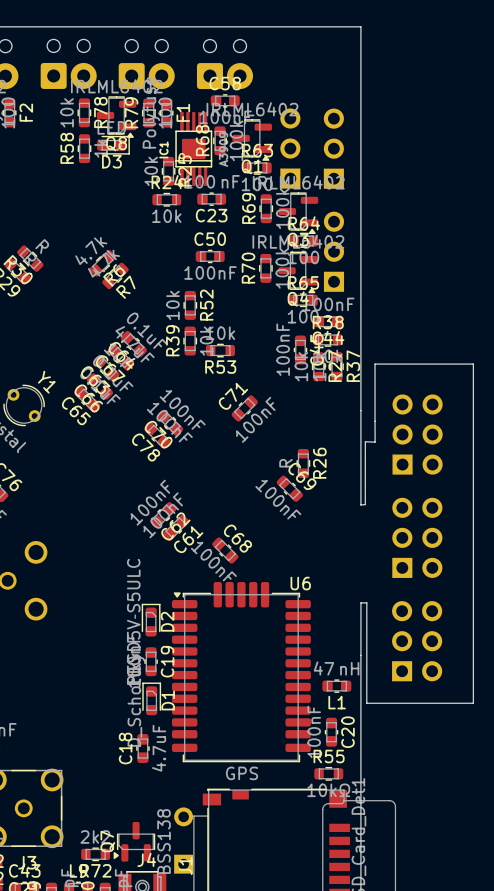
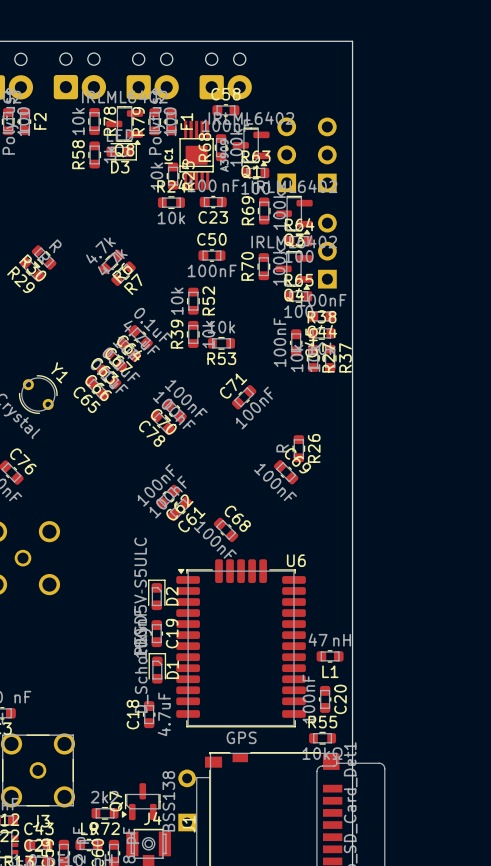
board edge: (360, 410) (360, 505) (365, 504) (365, 441) (375, 442) (375, 364) (473, 364) (473, 703) (366, 703) (366, 602) (360, 602) (360, 655) -> (352, 399) (352, 627)
part: (417, 434) -> none
part: (417, 537) -> none
part: (417, 641) -> none

